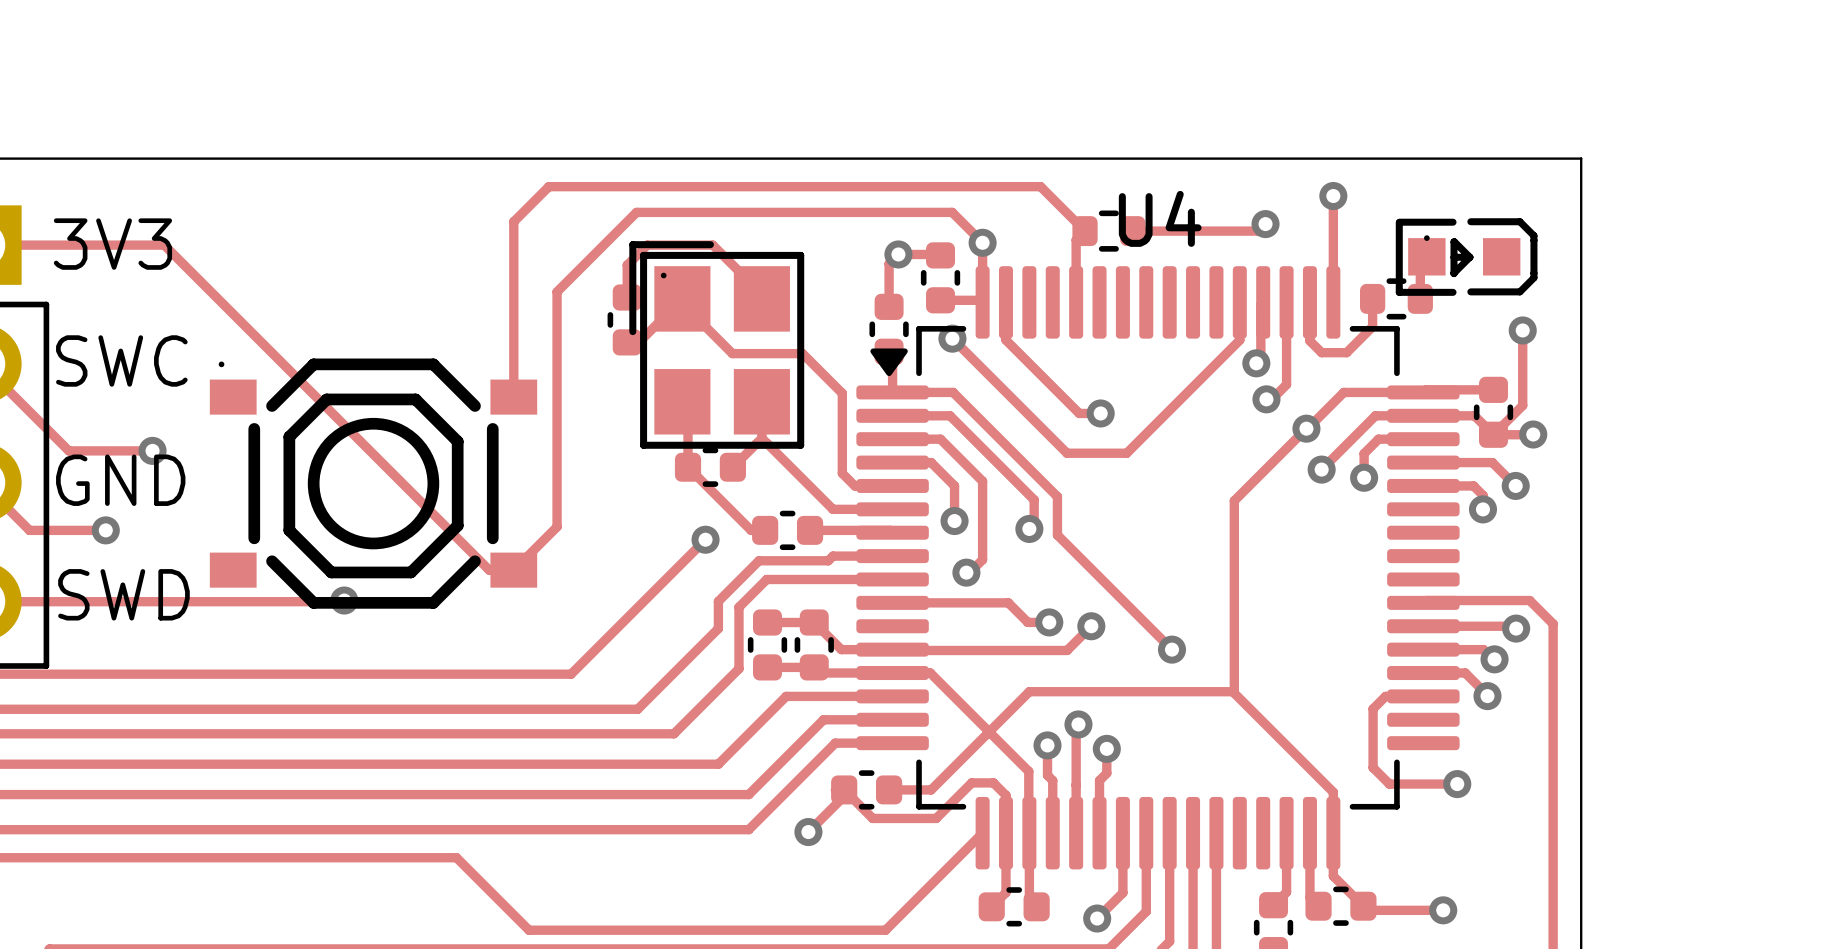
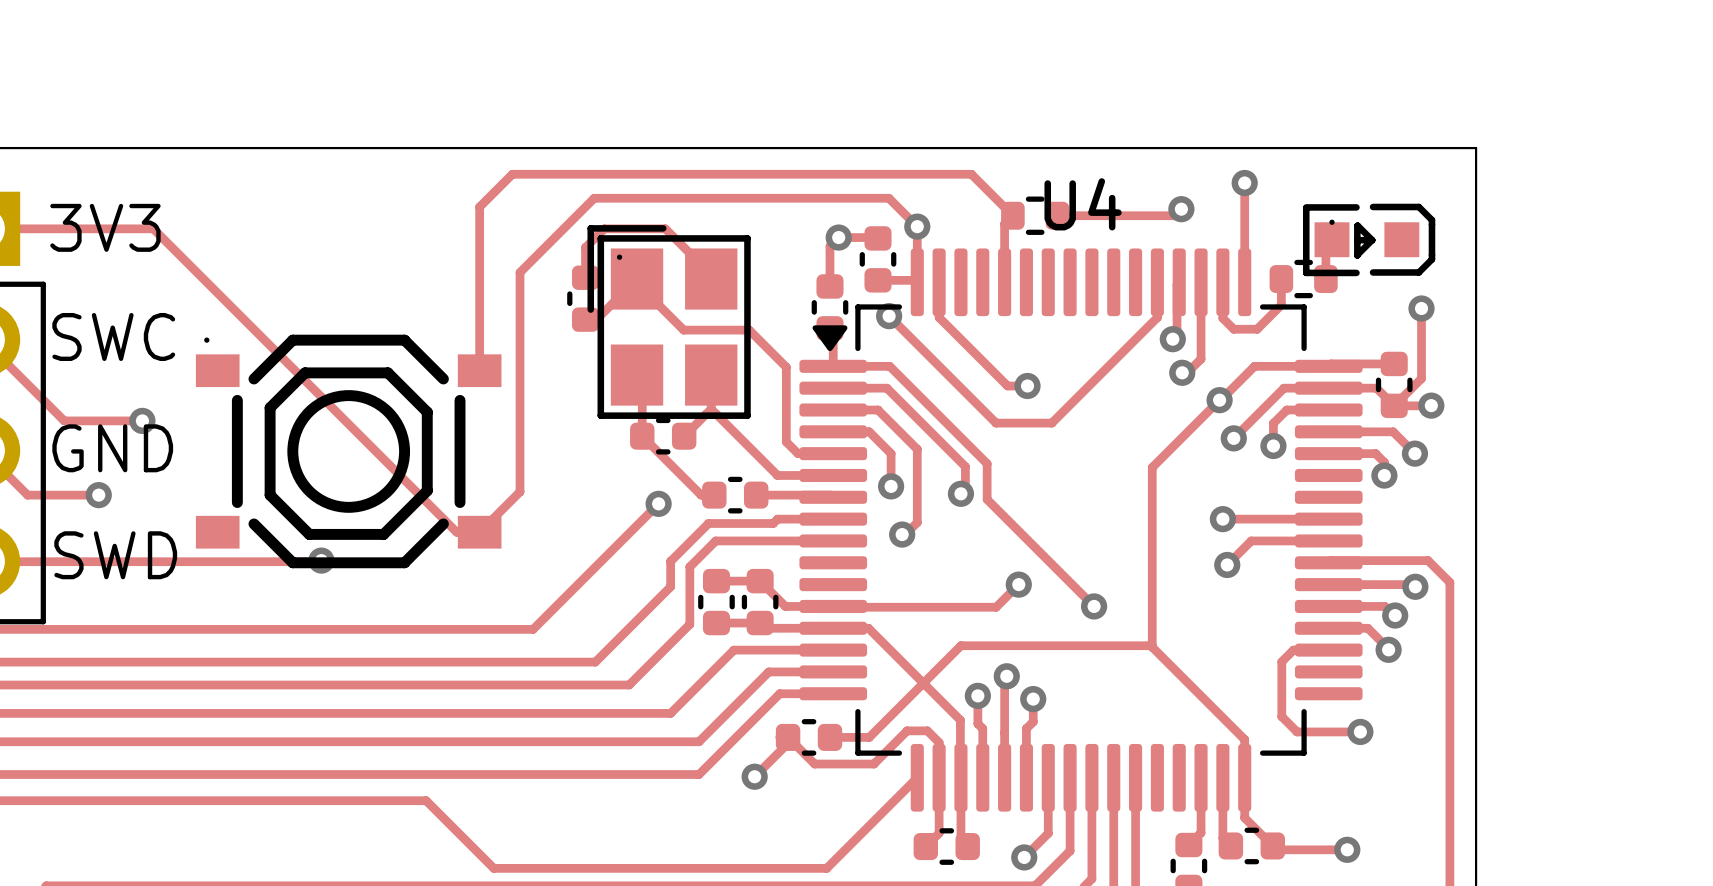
track: none -> (1222, 519) (1328, 519)
via: none -> (1222, 519)
track: none -> (1328, 540) (1251, 540) (1227, 564)
track: (892, 602) (1008, 602) (1027, 622) (1049, 622) -> none
via: none -> (1227, 564)
via: (1049, 622) -> none

